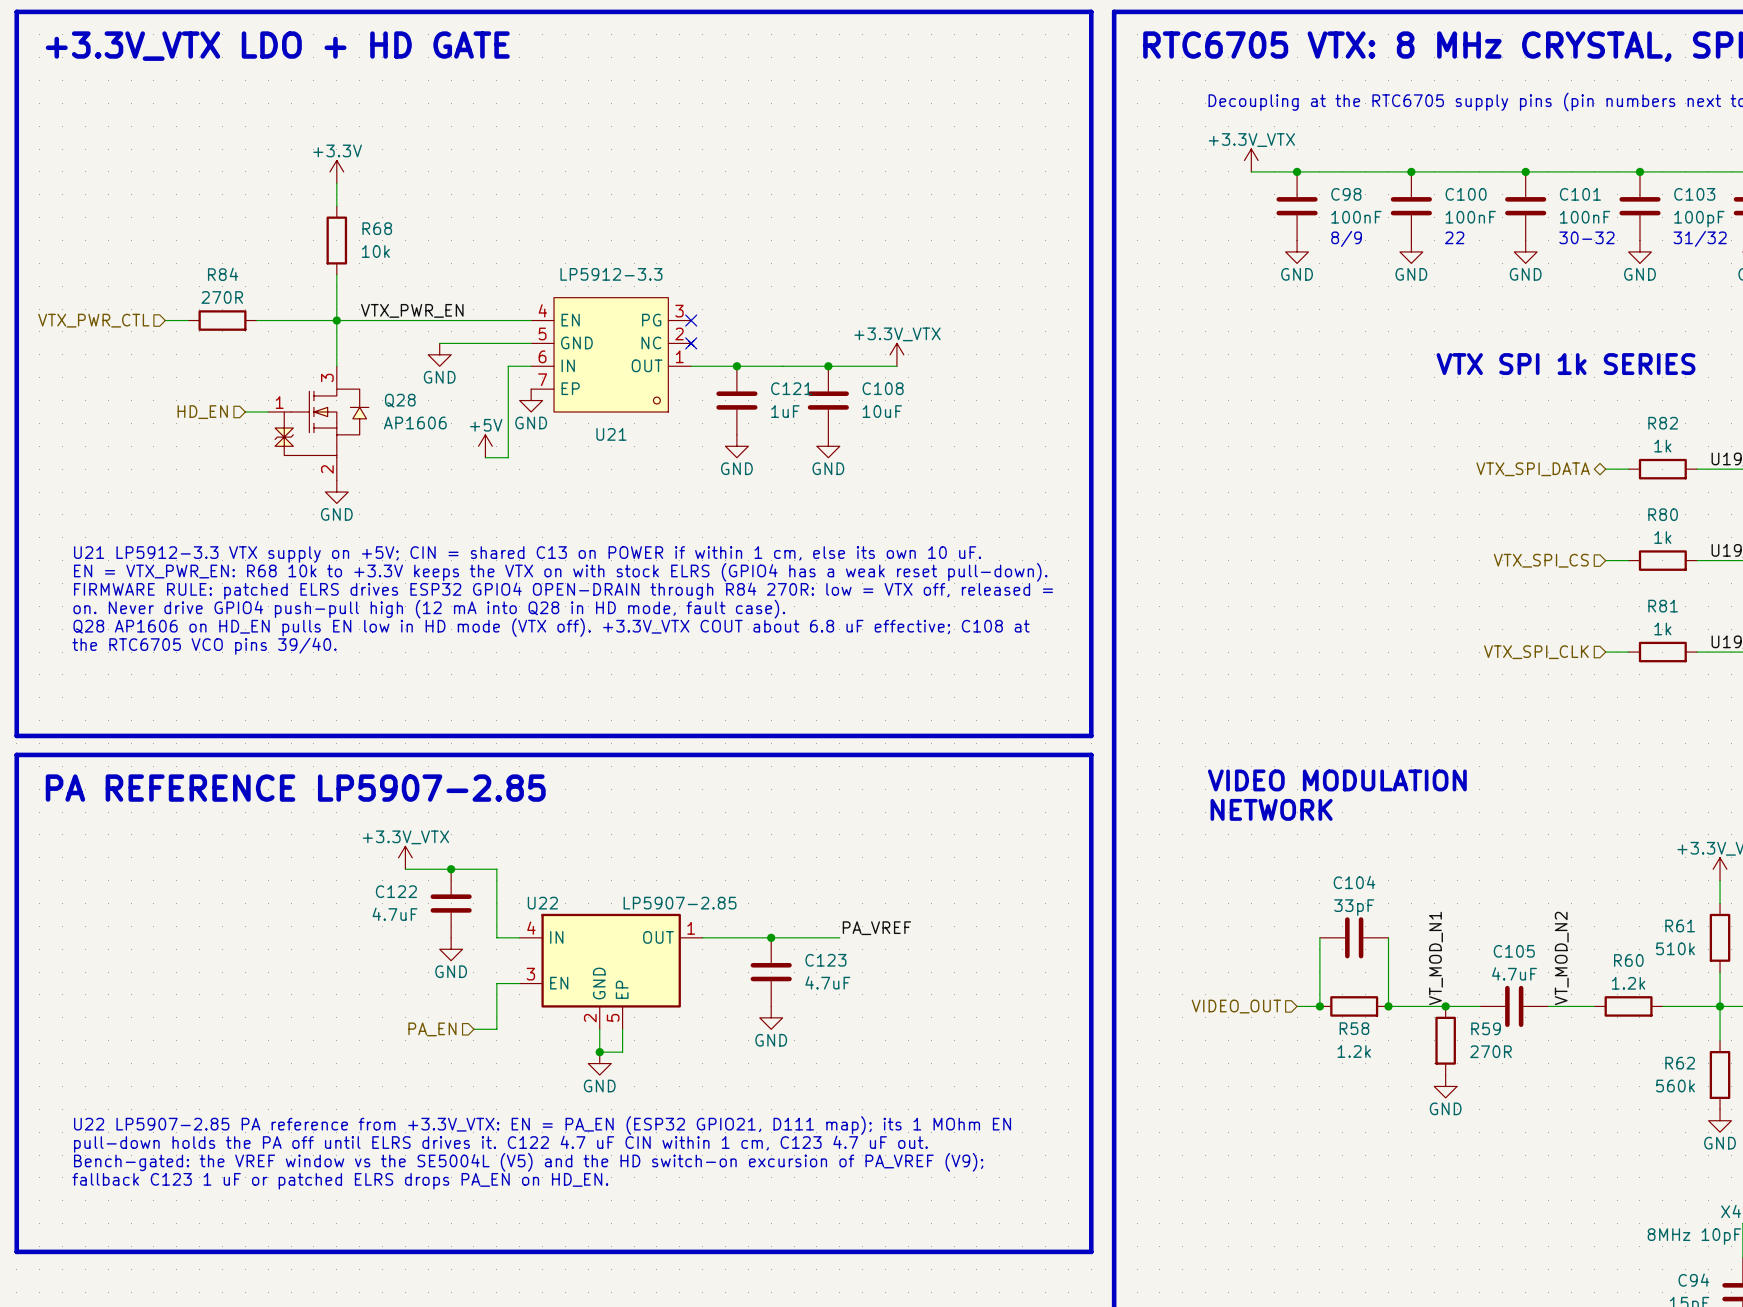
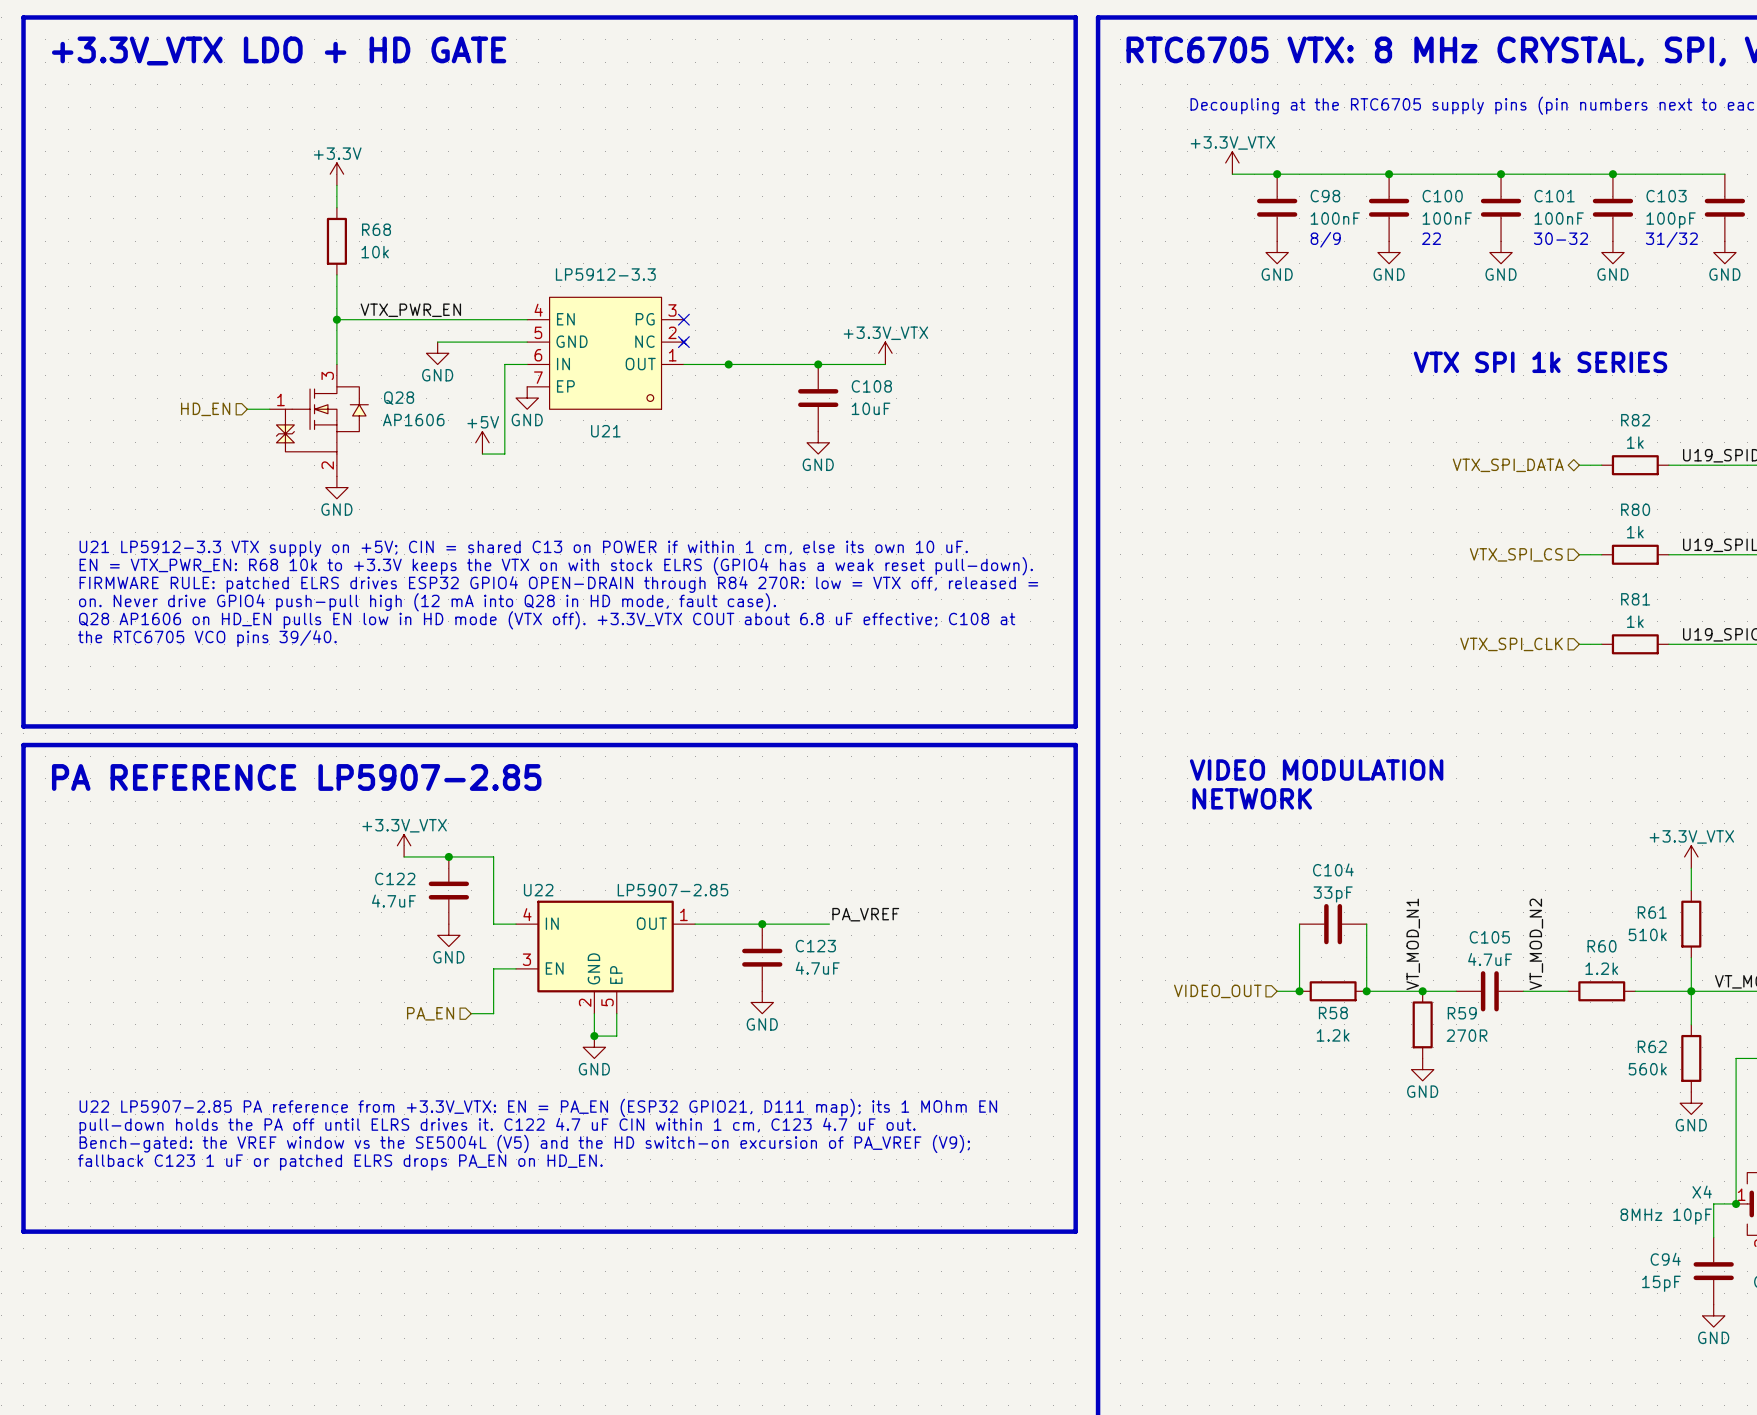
hierarchical label: VTX_PWR_CTL (93, 320) -> none
wire: (165, 320) (188, 320) -> none
R84: 270R (222, 320) -> none
wire: (256, 320) (336, 320) -> none
C121: 1uF (736, 400) -> none
power symbol: GND (736, 446) -> none

